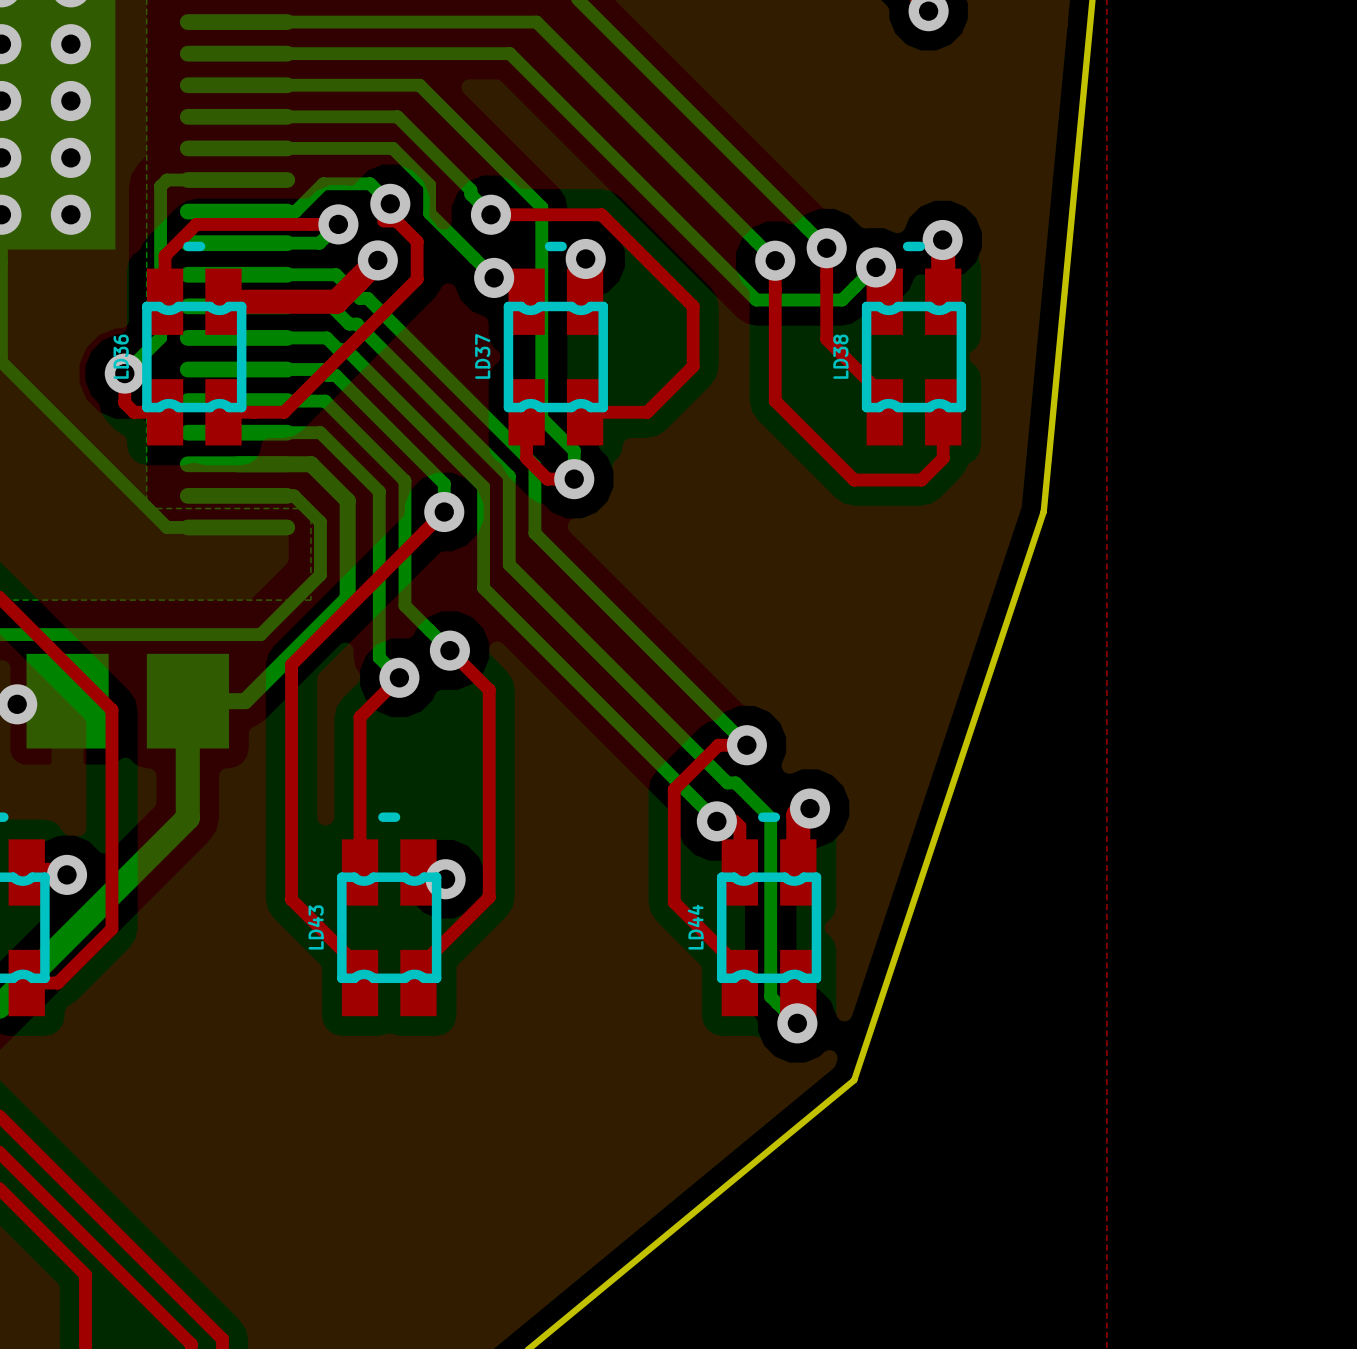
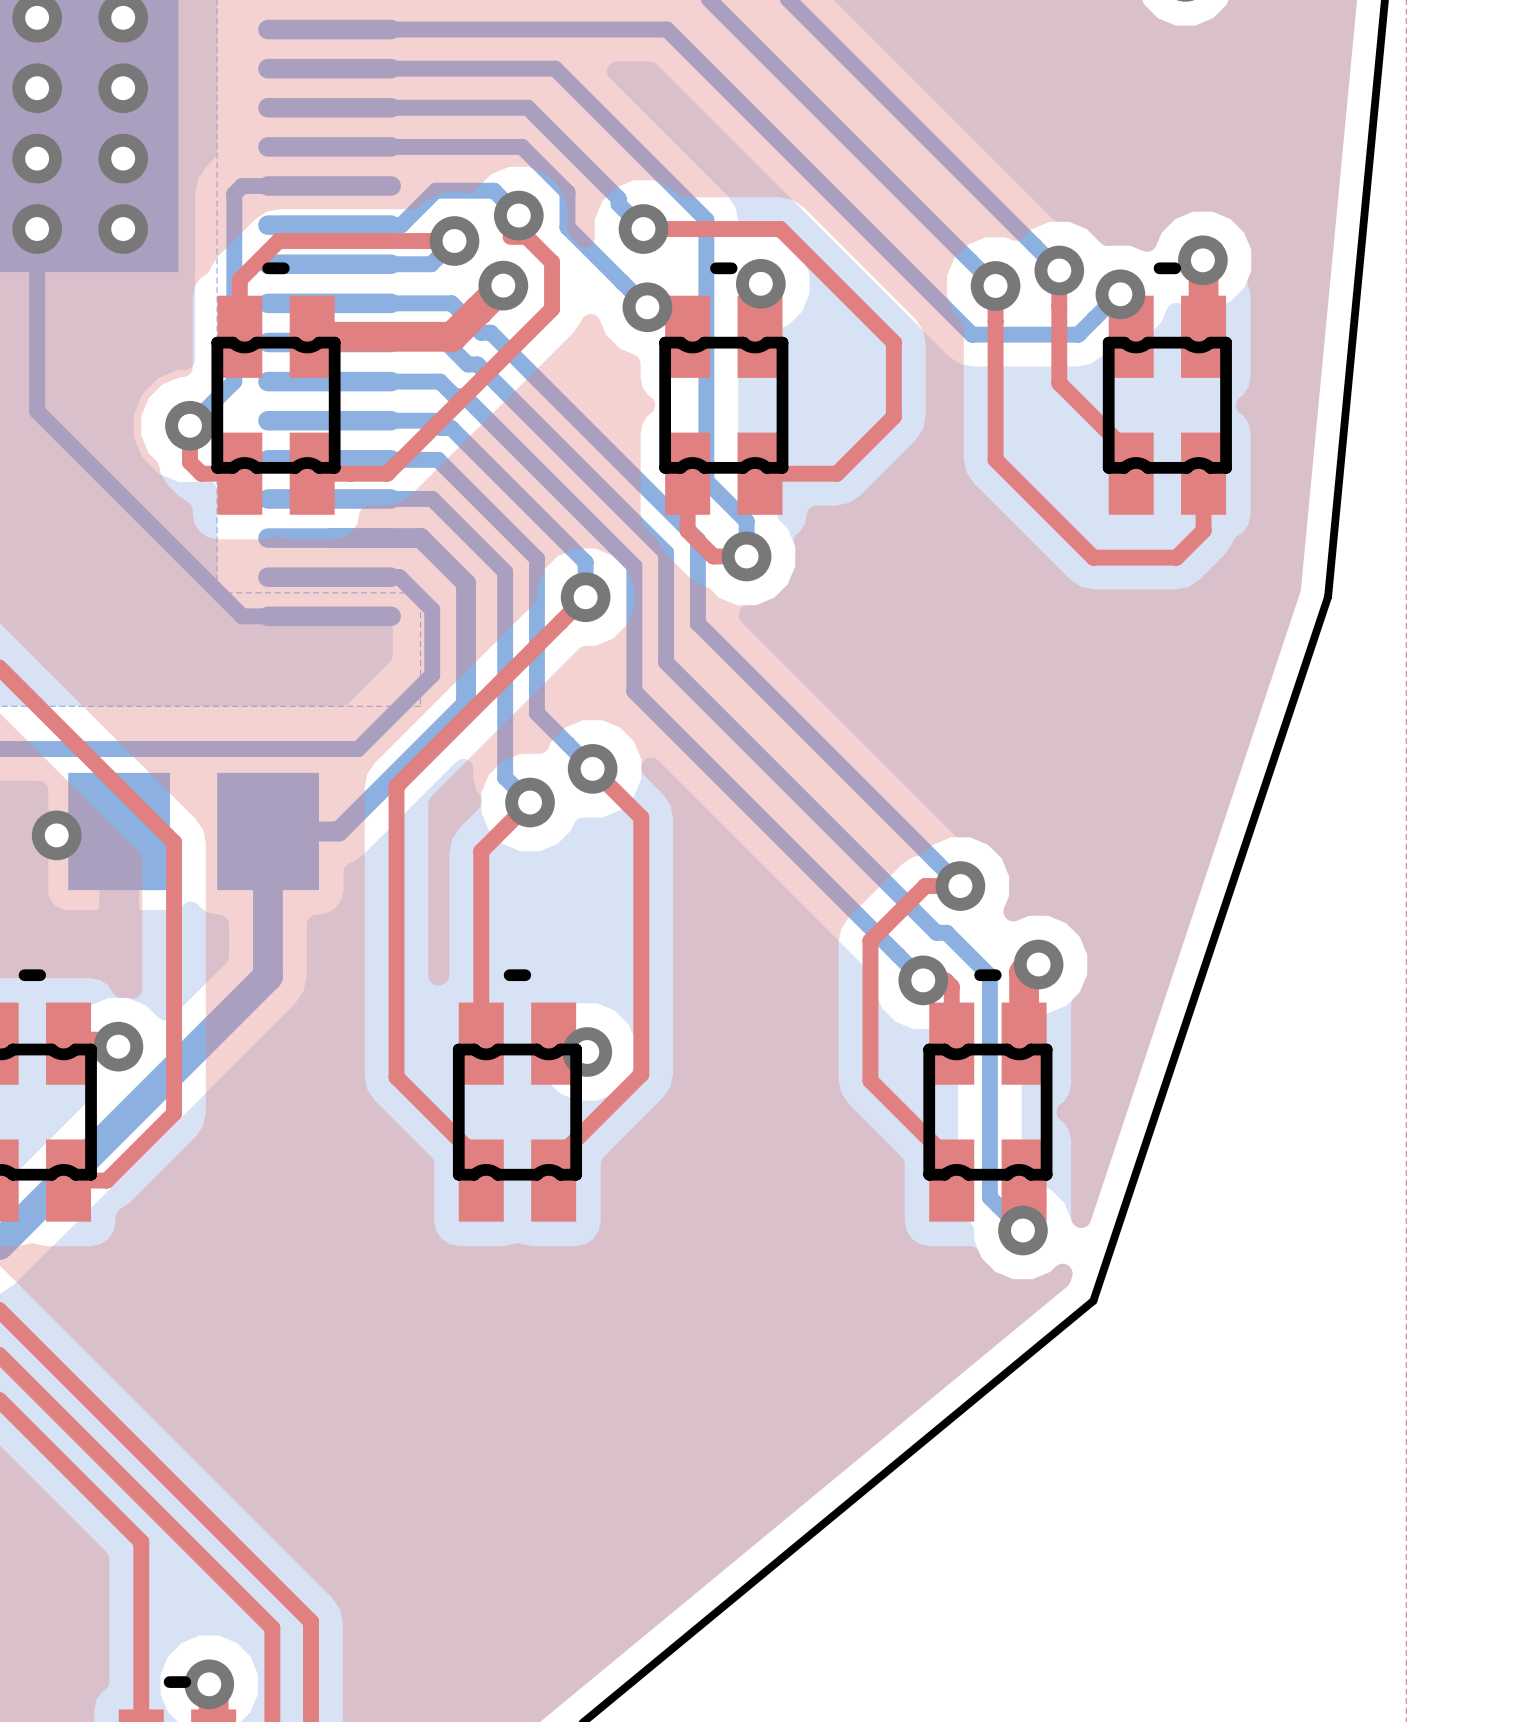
LD36 name: LD36 (121, 356) -> none
LD37 name: LD37 (482, 356) -> none
LD38 name: LD38 (840, 356) -> none
LD43 name: LD43 (315, 927) -> none
LD44 name: LD44 (695, 927) -> none

